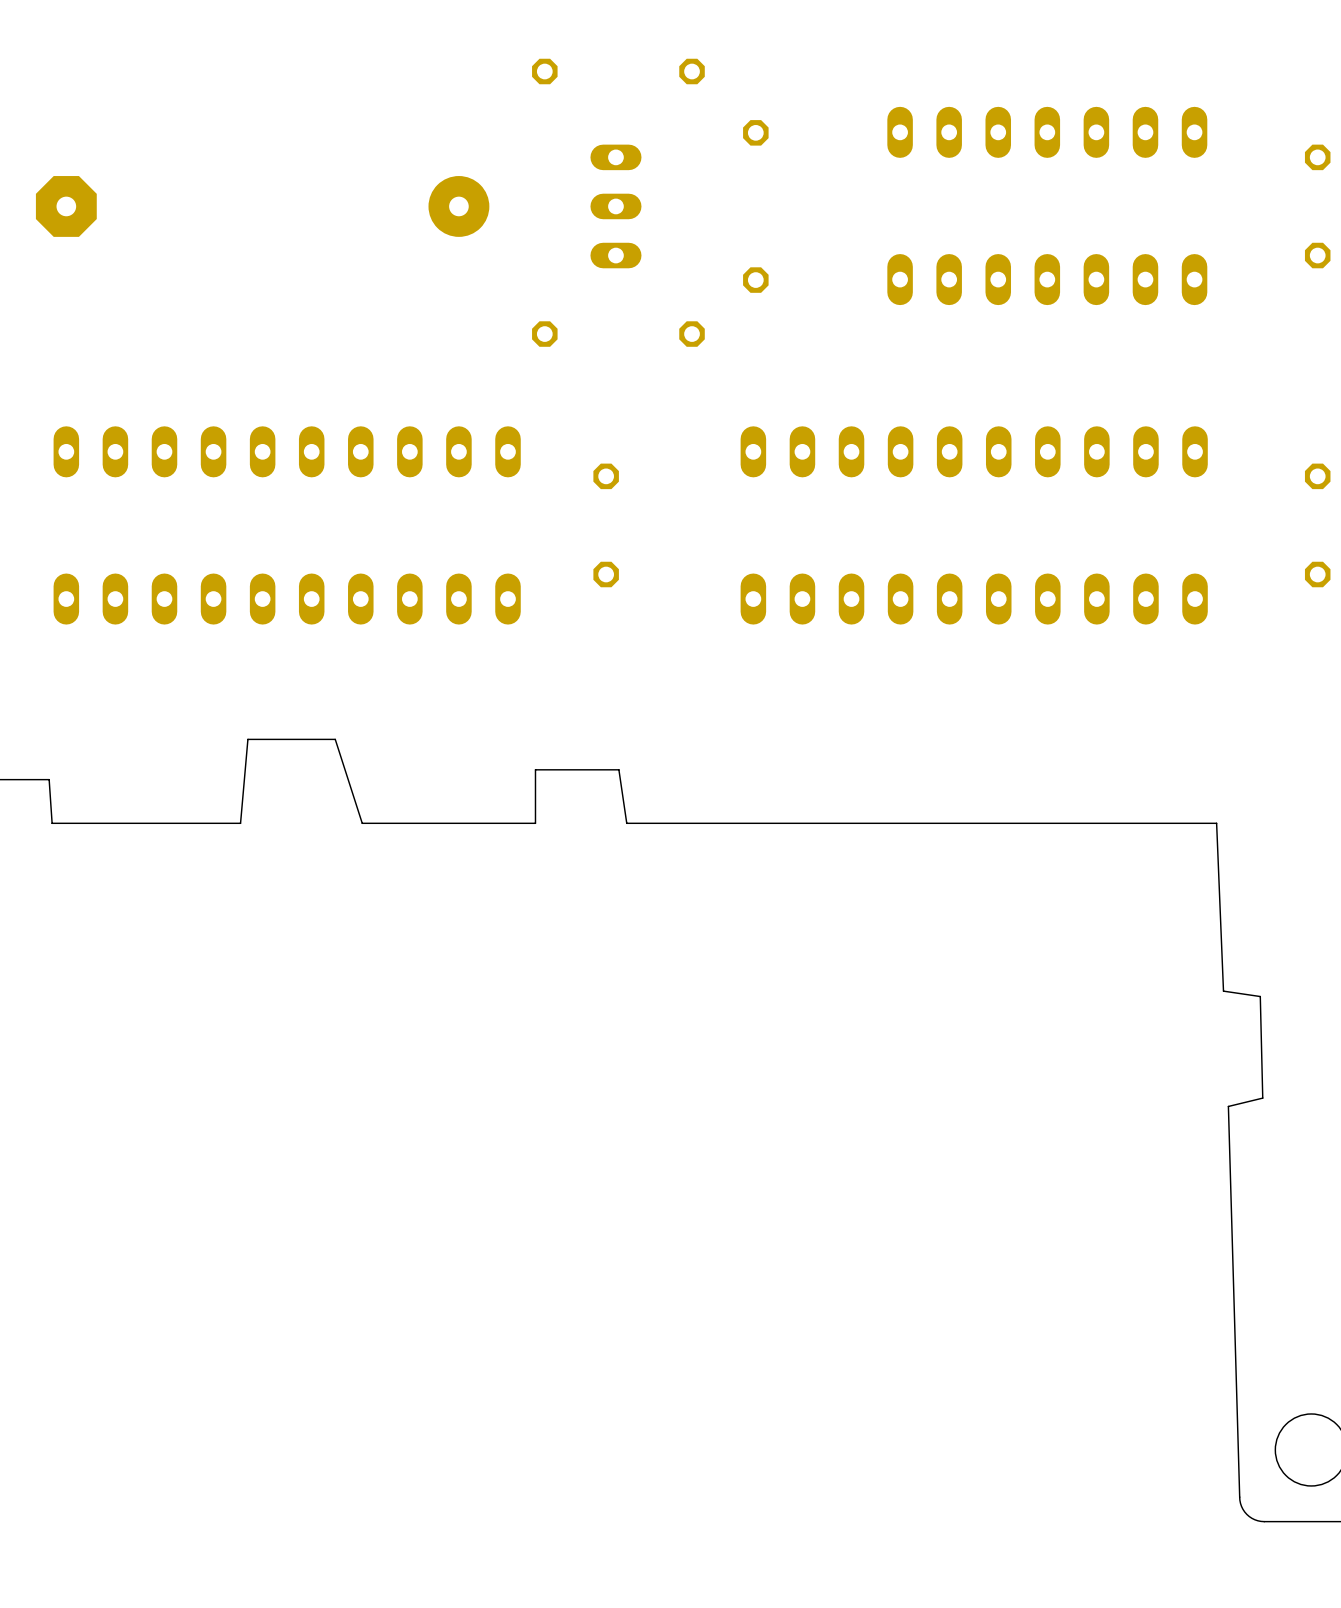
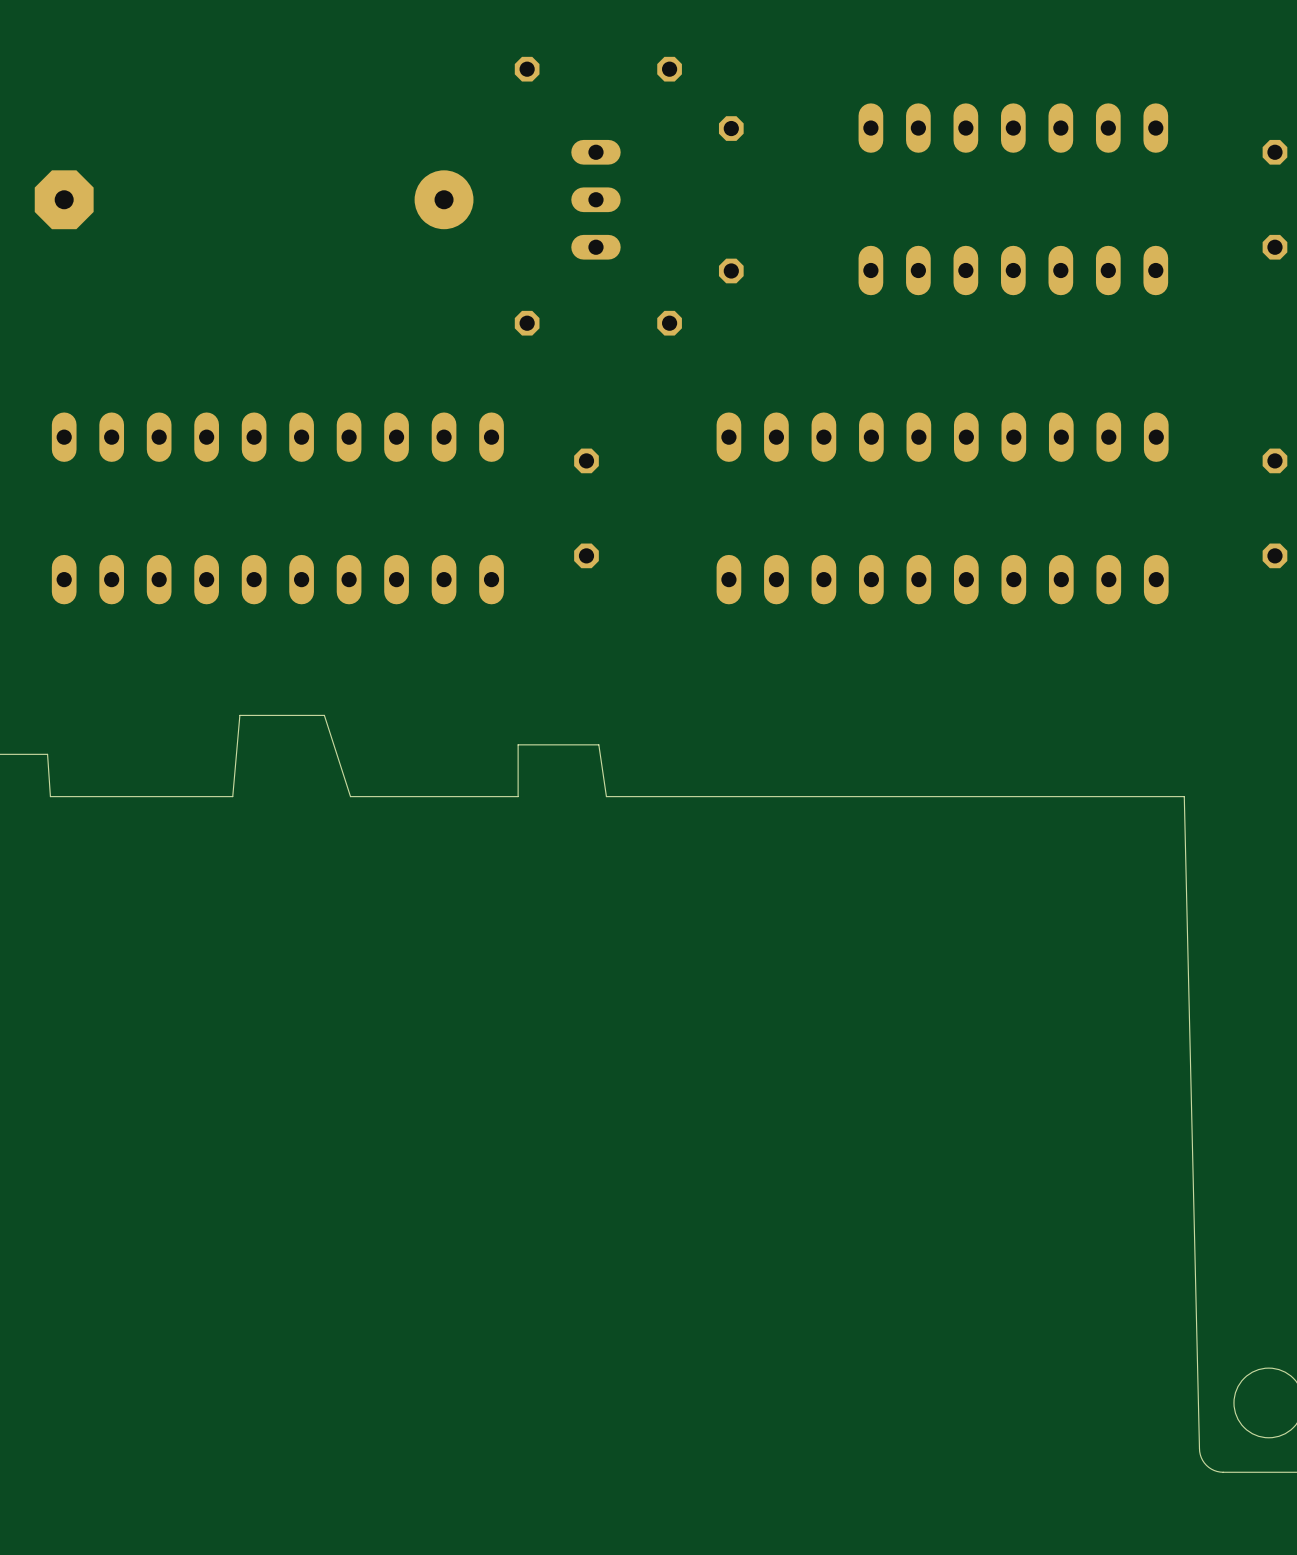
board edge: (1216, 823) (1223, 991) (1260, 996) (1262, 1098) (1228, 1106) (1239, 1497) -> (1177, 796) (1184, 796) (1199, 1448)

